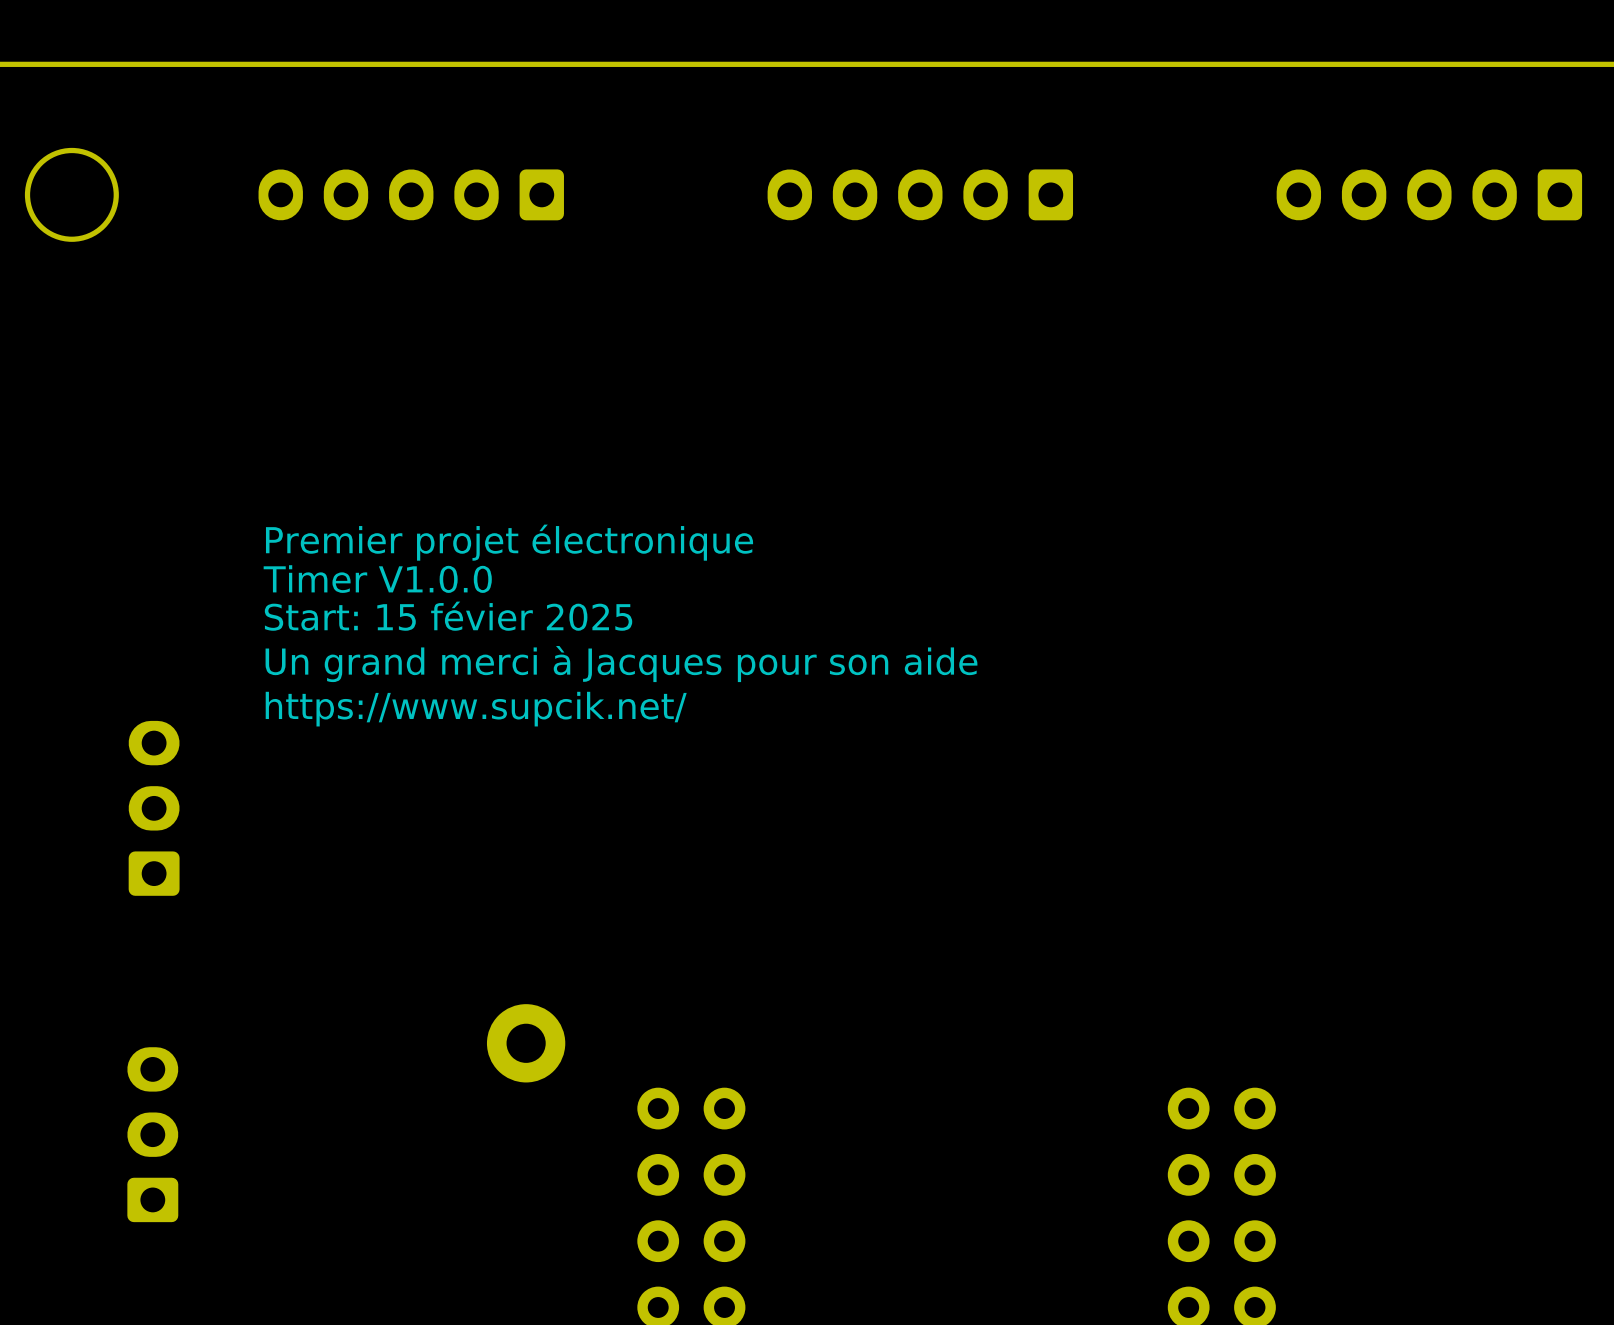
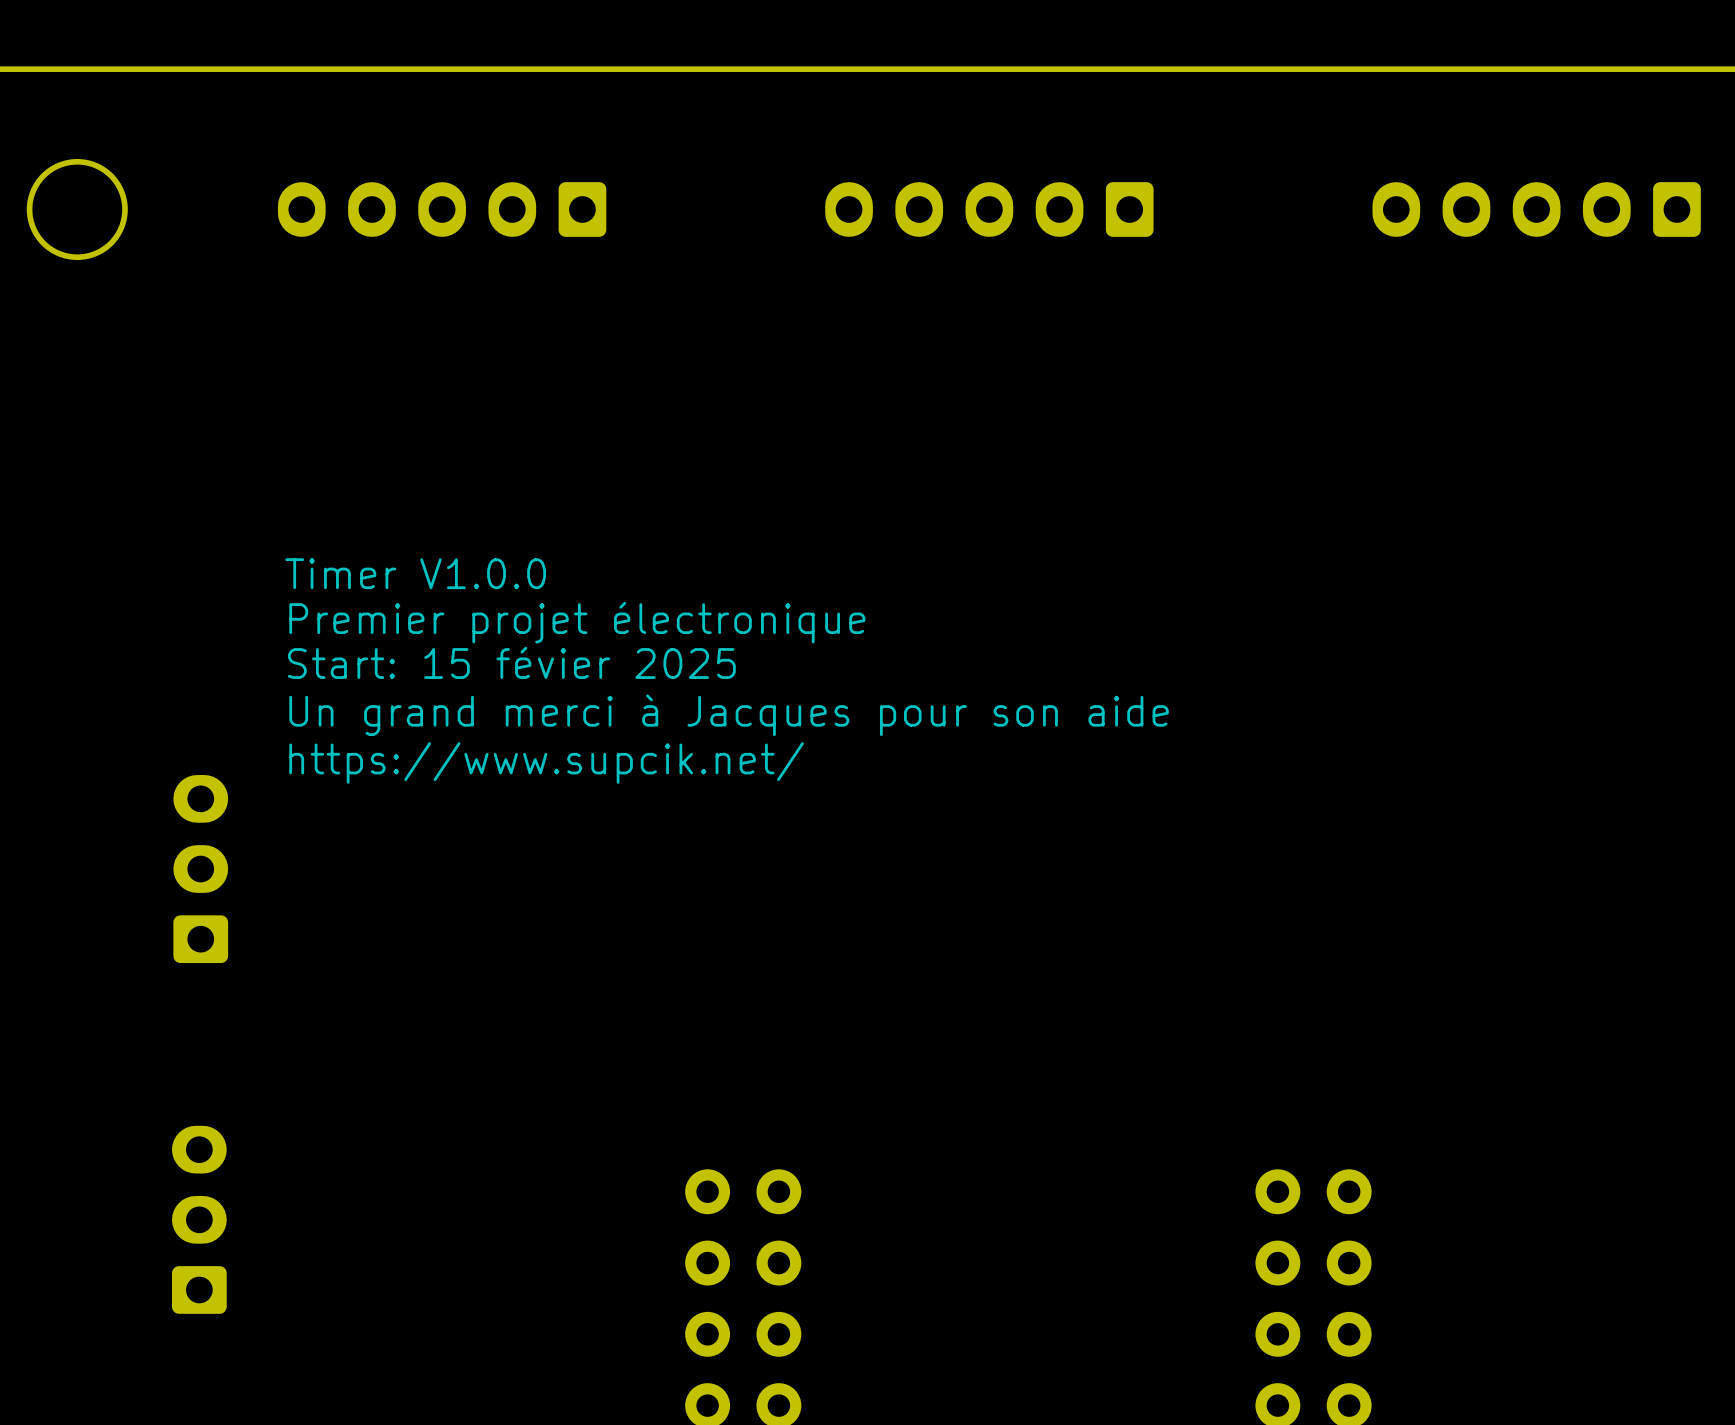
text: Premier projet électronique (509, 542) -> Timer V1.0.0 (415, 573)
text: Timer V1.0.0 (377, 579) -> Premier projet électronique (577, 622)
part position: (154, 808) -> (200, 869)
part: (526, 1043) -> none
part position: (152, 1134) -> (199, 1219)

